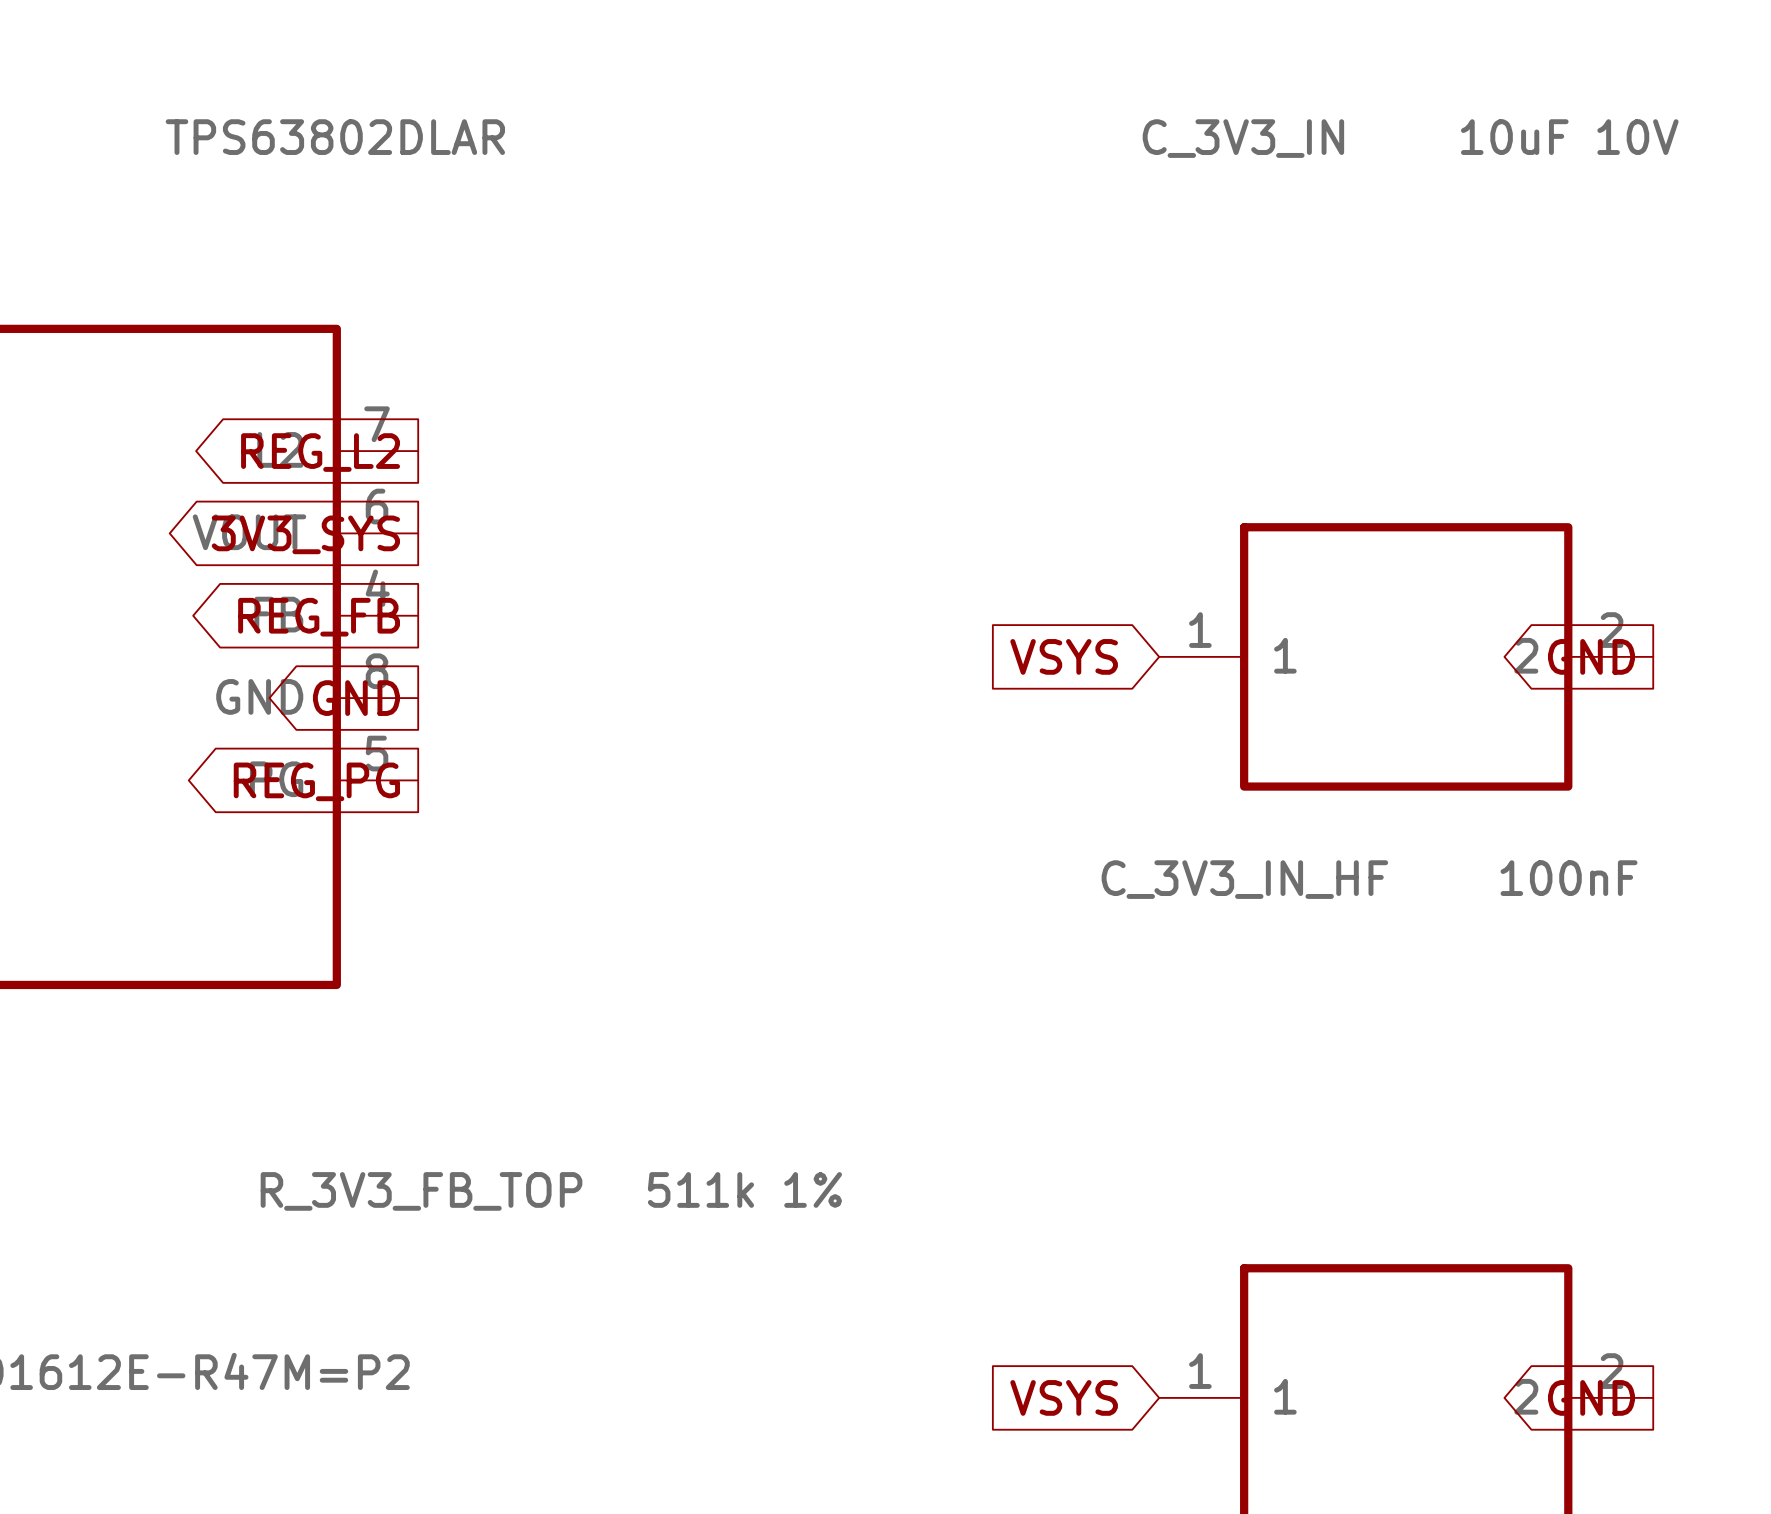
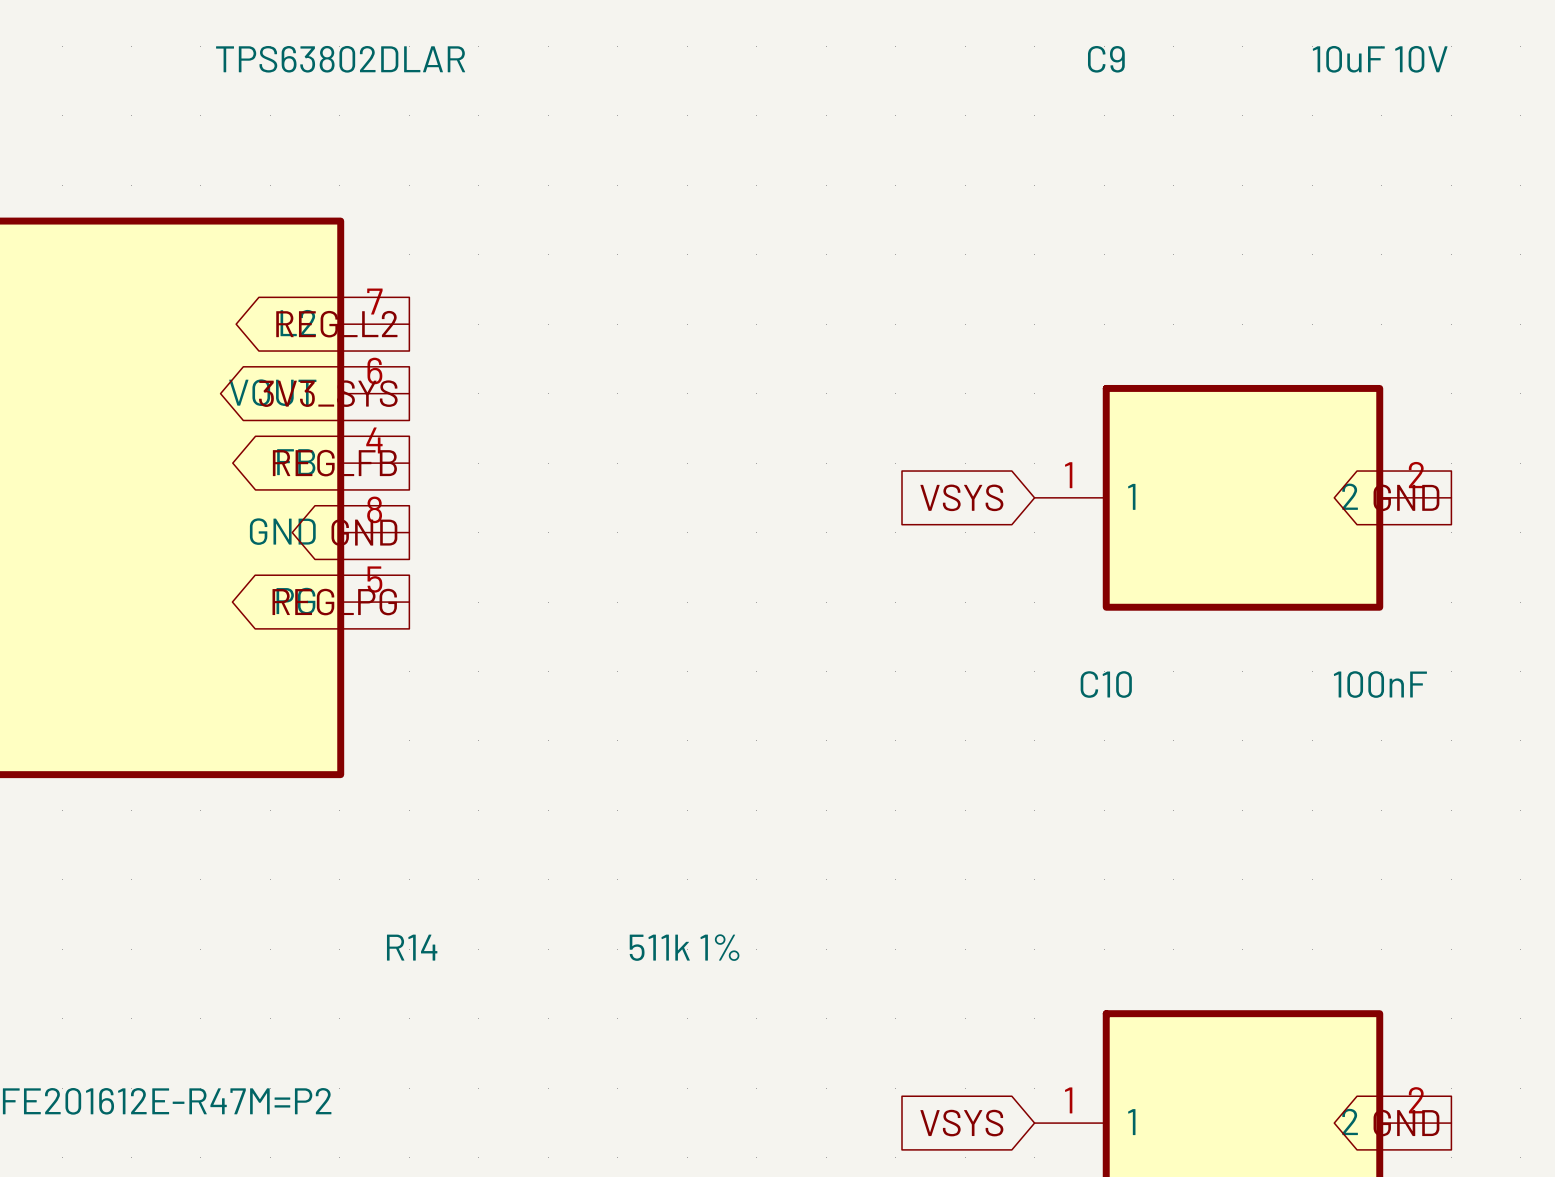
C_3V3_IN name: C_3V3_IN (1243, 138) -> C9 (1106, 59)
C_3V3_IN_HF name: C_3V3_IN_HF (1244, 879) -> C10 (1106, 684)
R_3V3_FB_TOP name: R_3V3_FB_TOP (421, 1191) -> R14 (412, 947)

